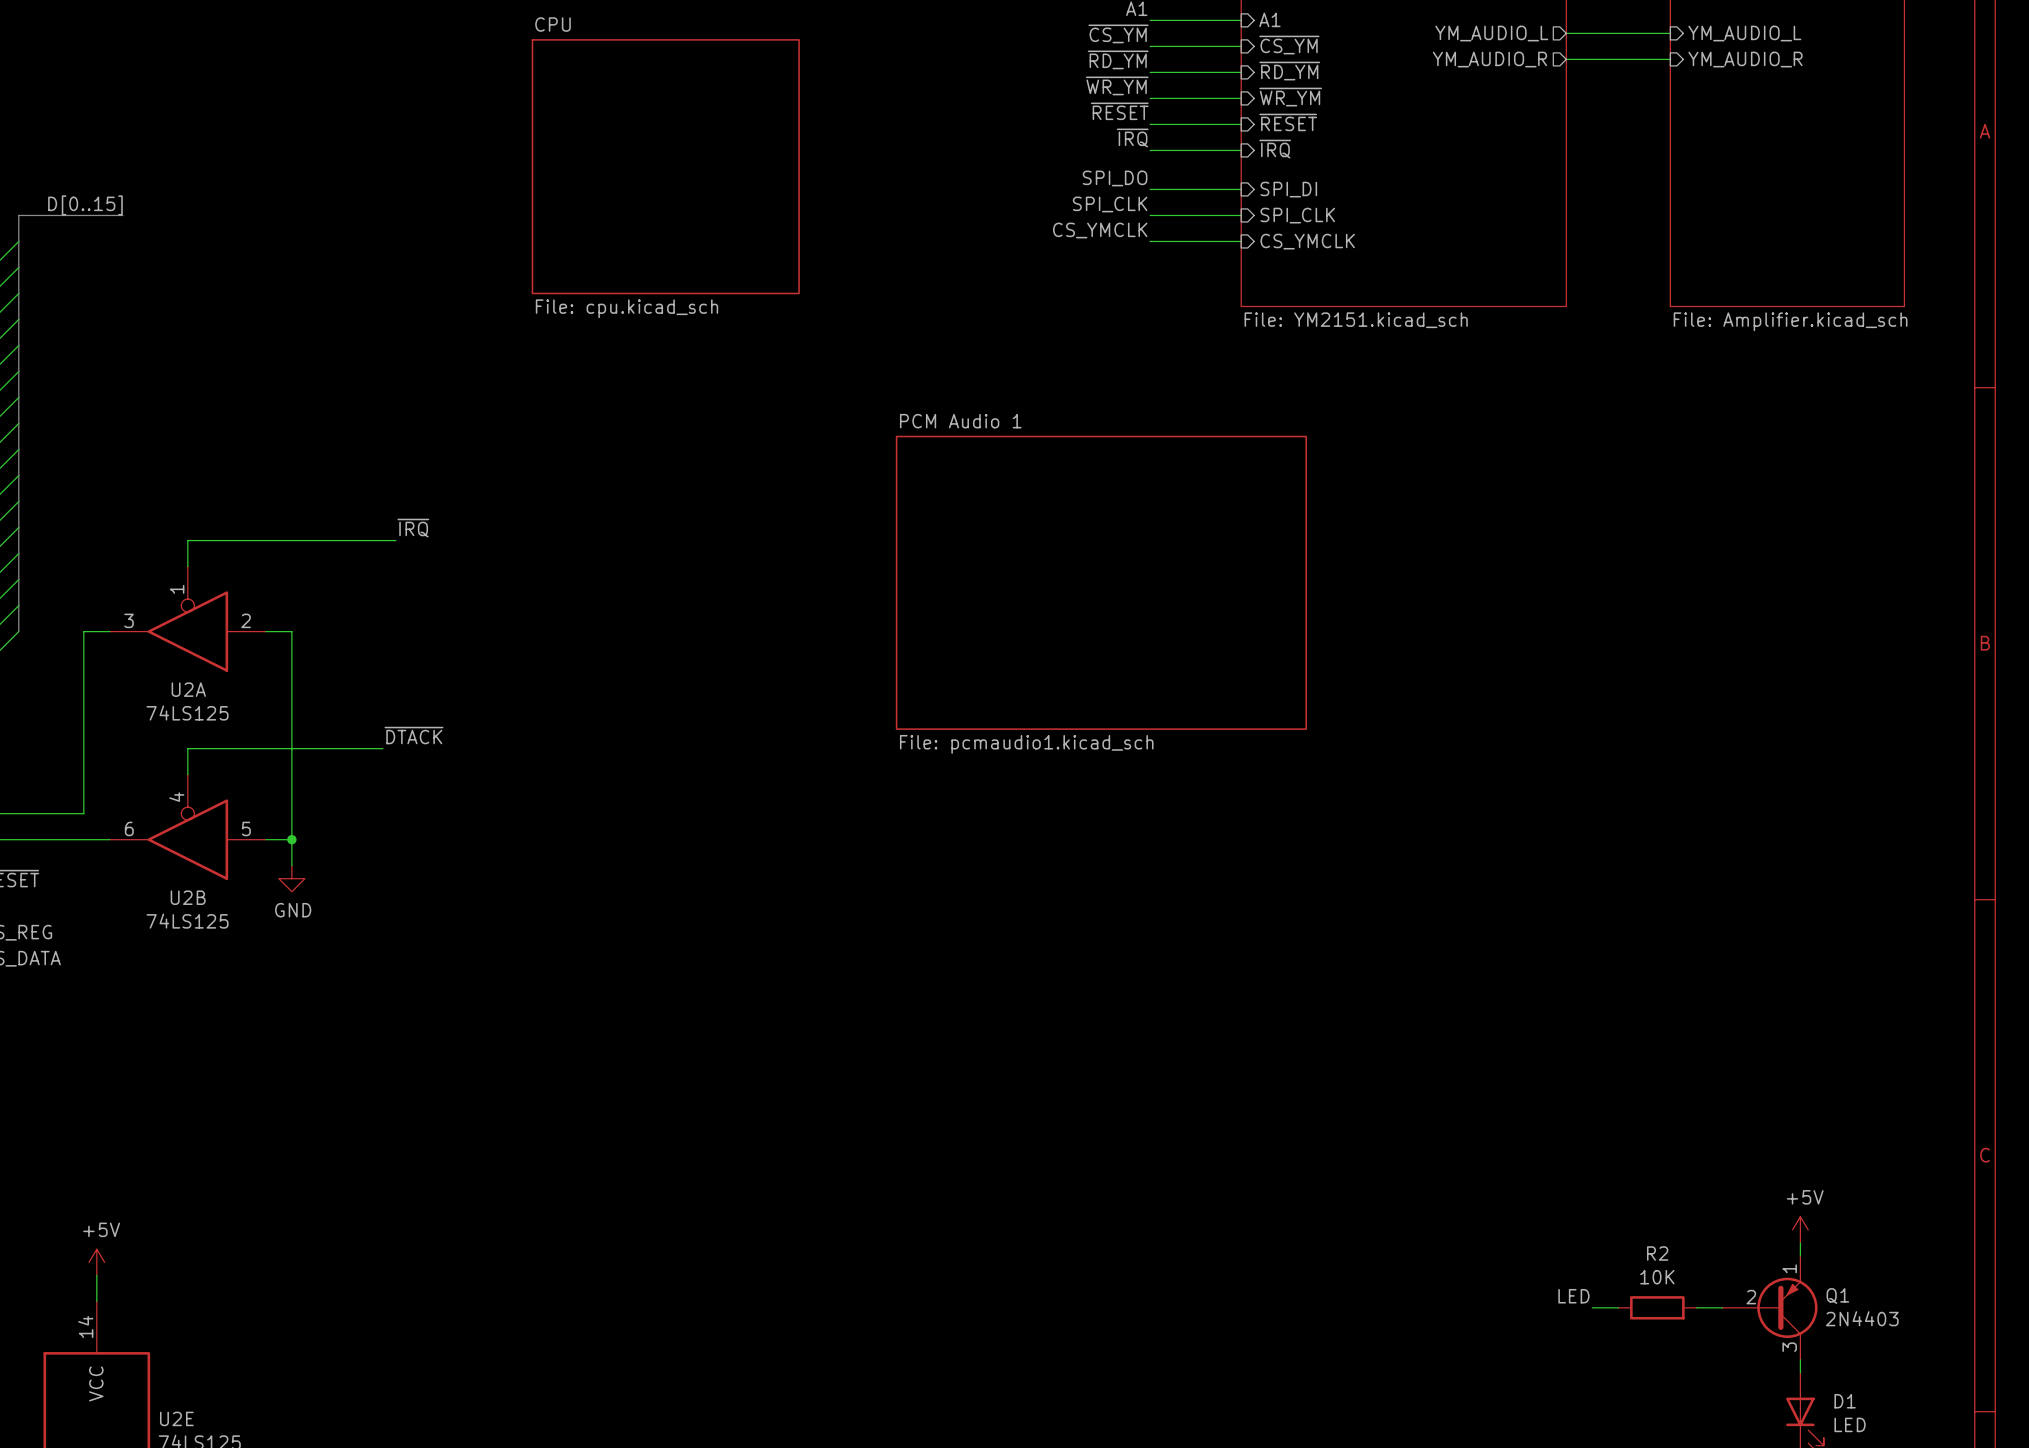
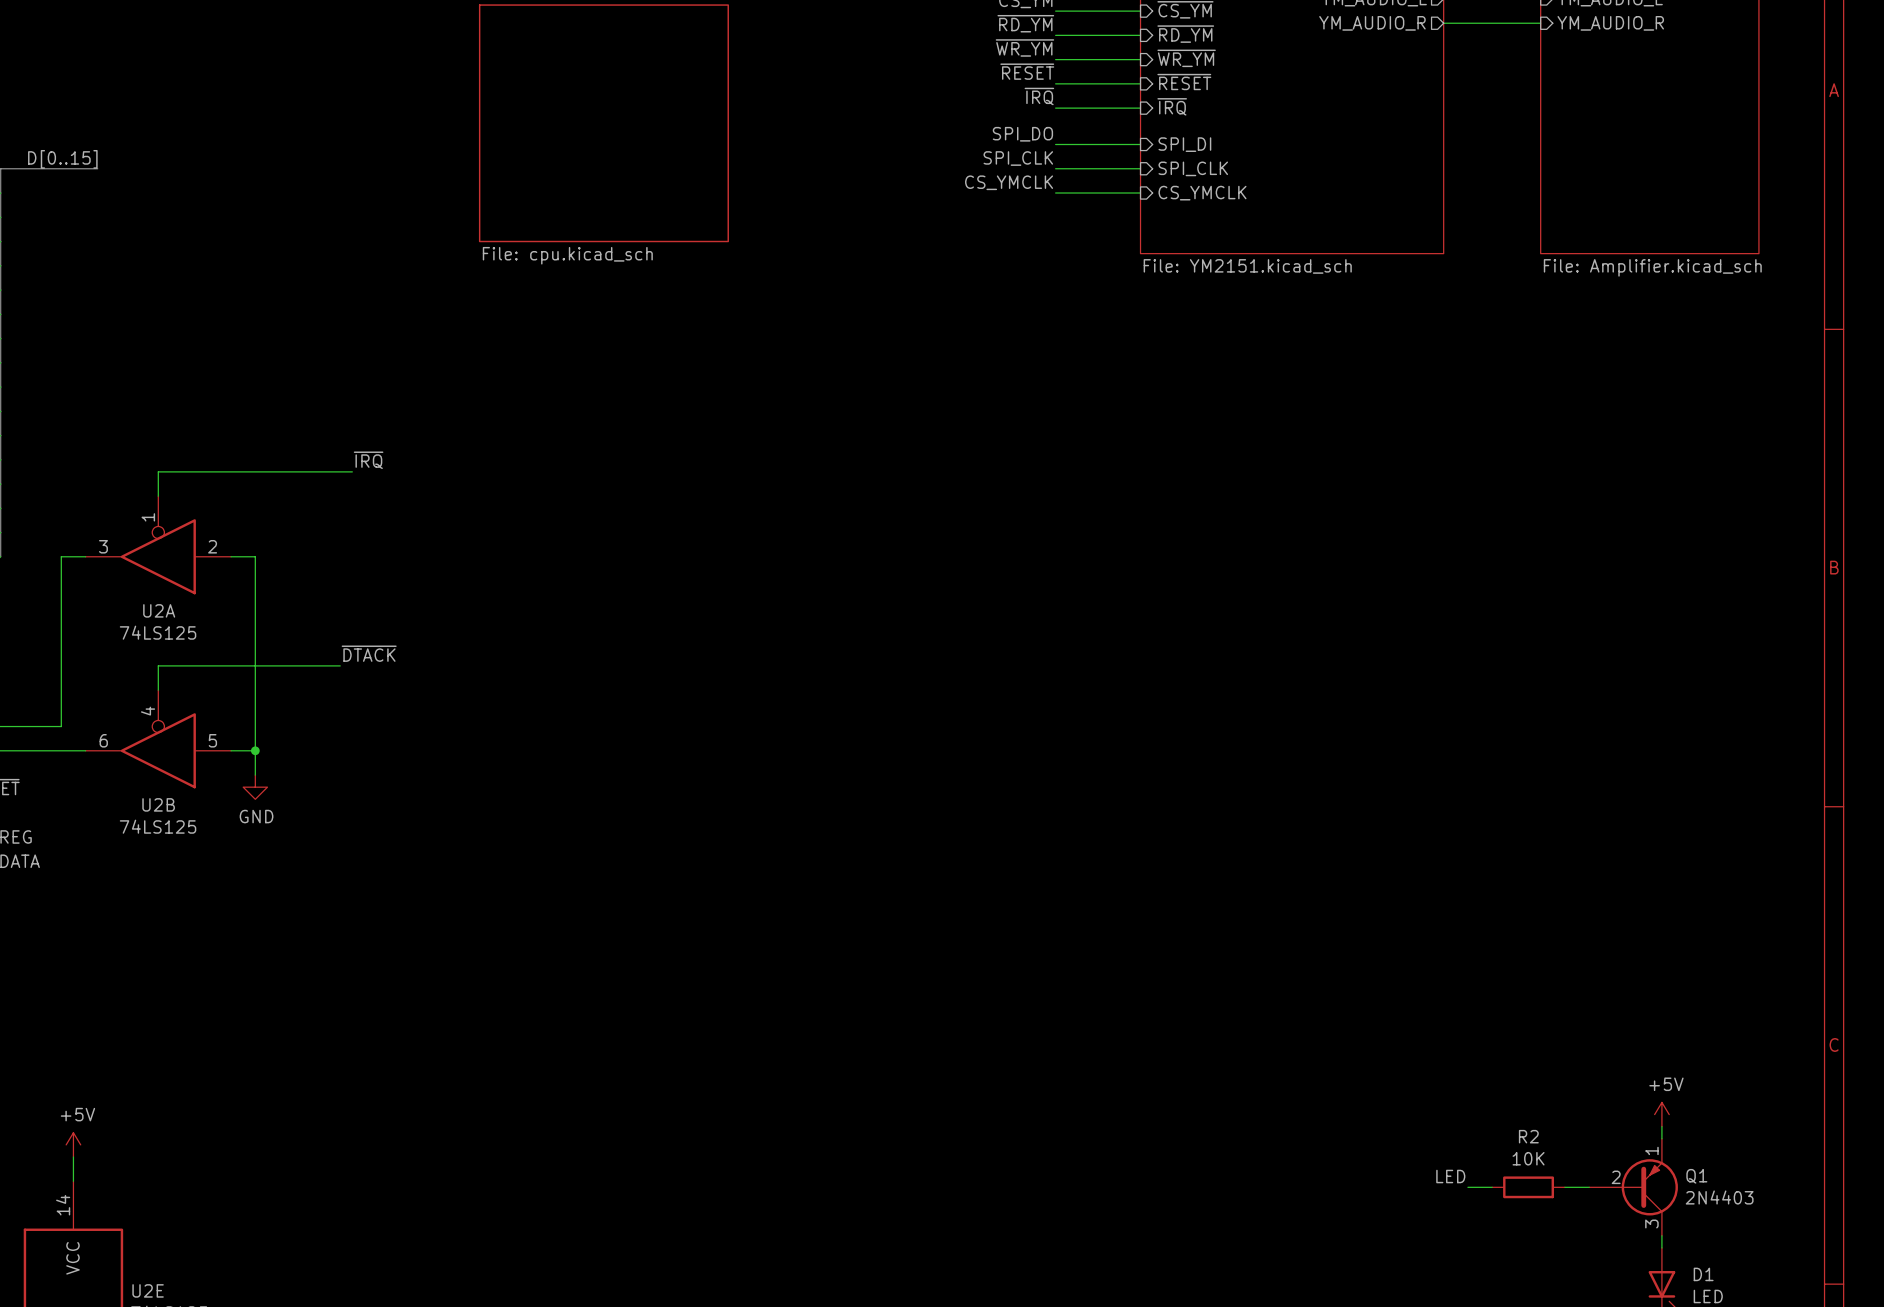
sheet PCM Audio 1: File: pcmaudio1.kicad_sch (1101, 582) -> none

